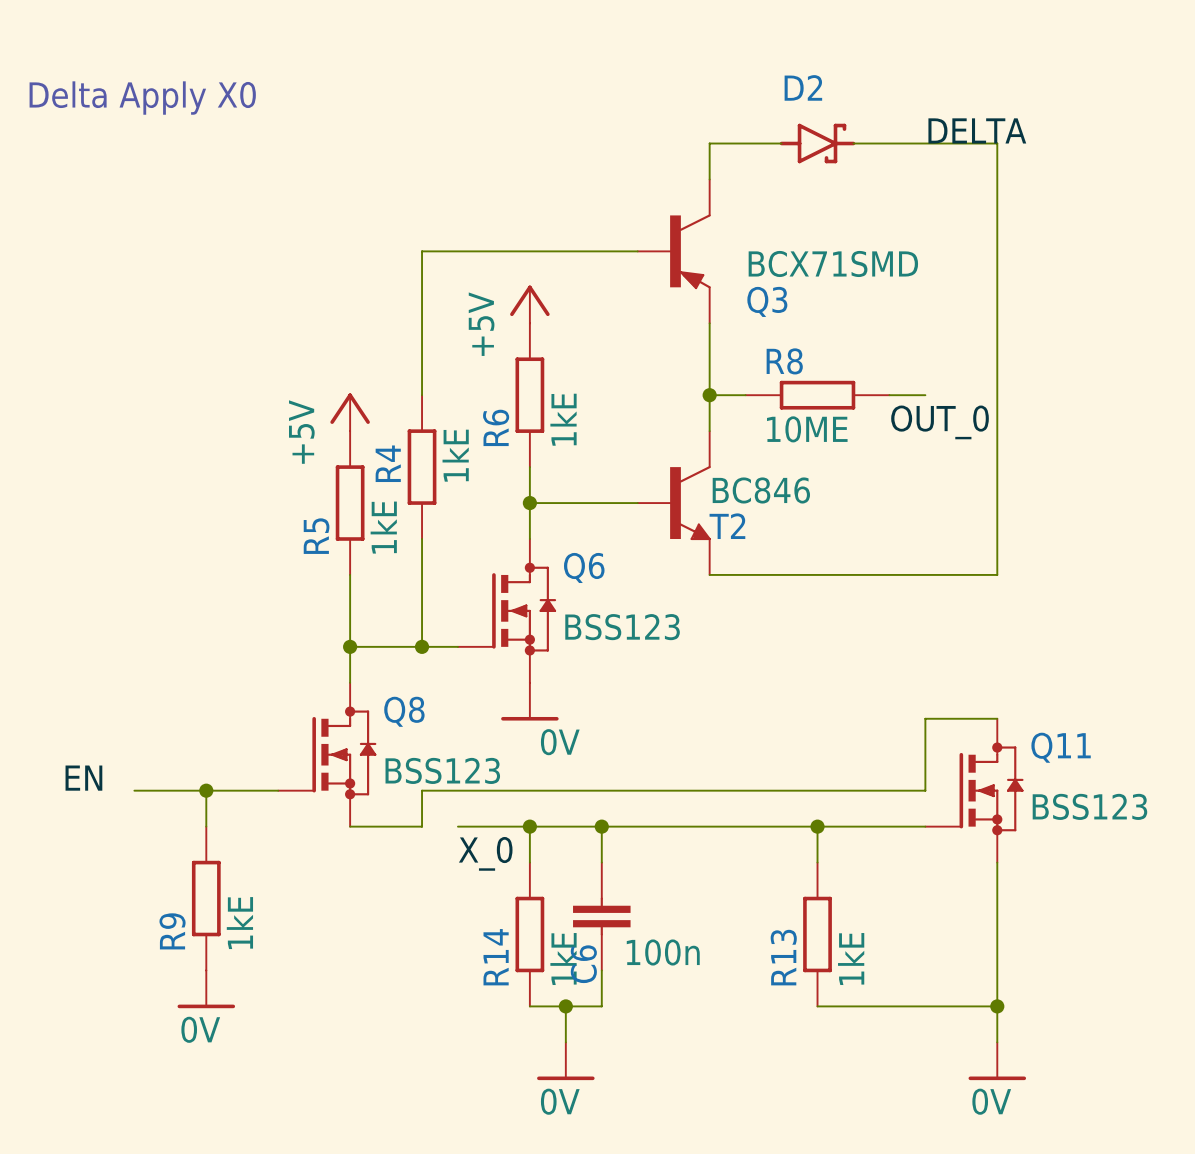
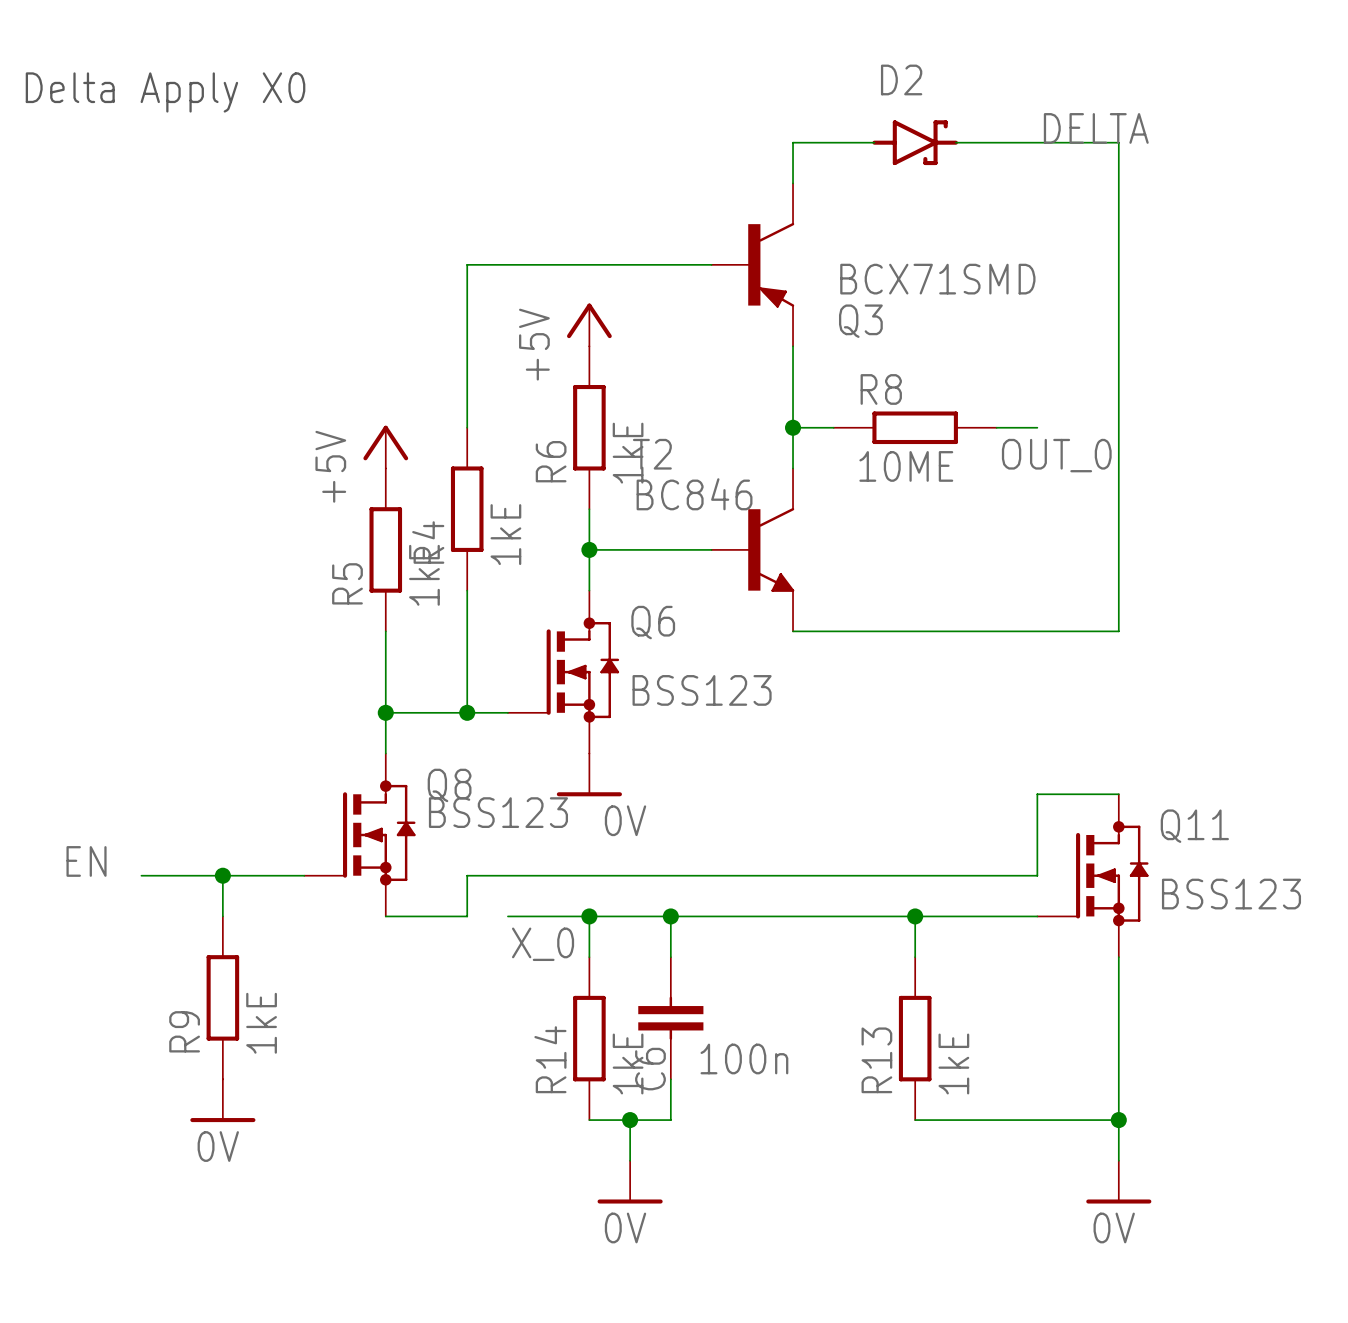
R4 value position: 1kE (455, 455) -> 1kE (505, 534)
R4 name position: R4 (388, 463) -> R4 (428, 542)
T2 value position: BC846 (761, 490) -> BC846 (694, 494)
T2 name position: T2 (727, 526) -> T2 (652, 454)
Q8 value position: BSS123 (442, 770) -> BSS123 (498, 812)

